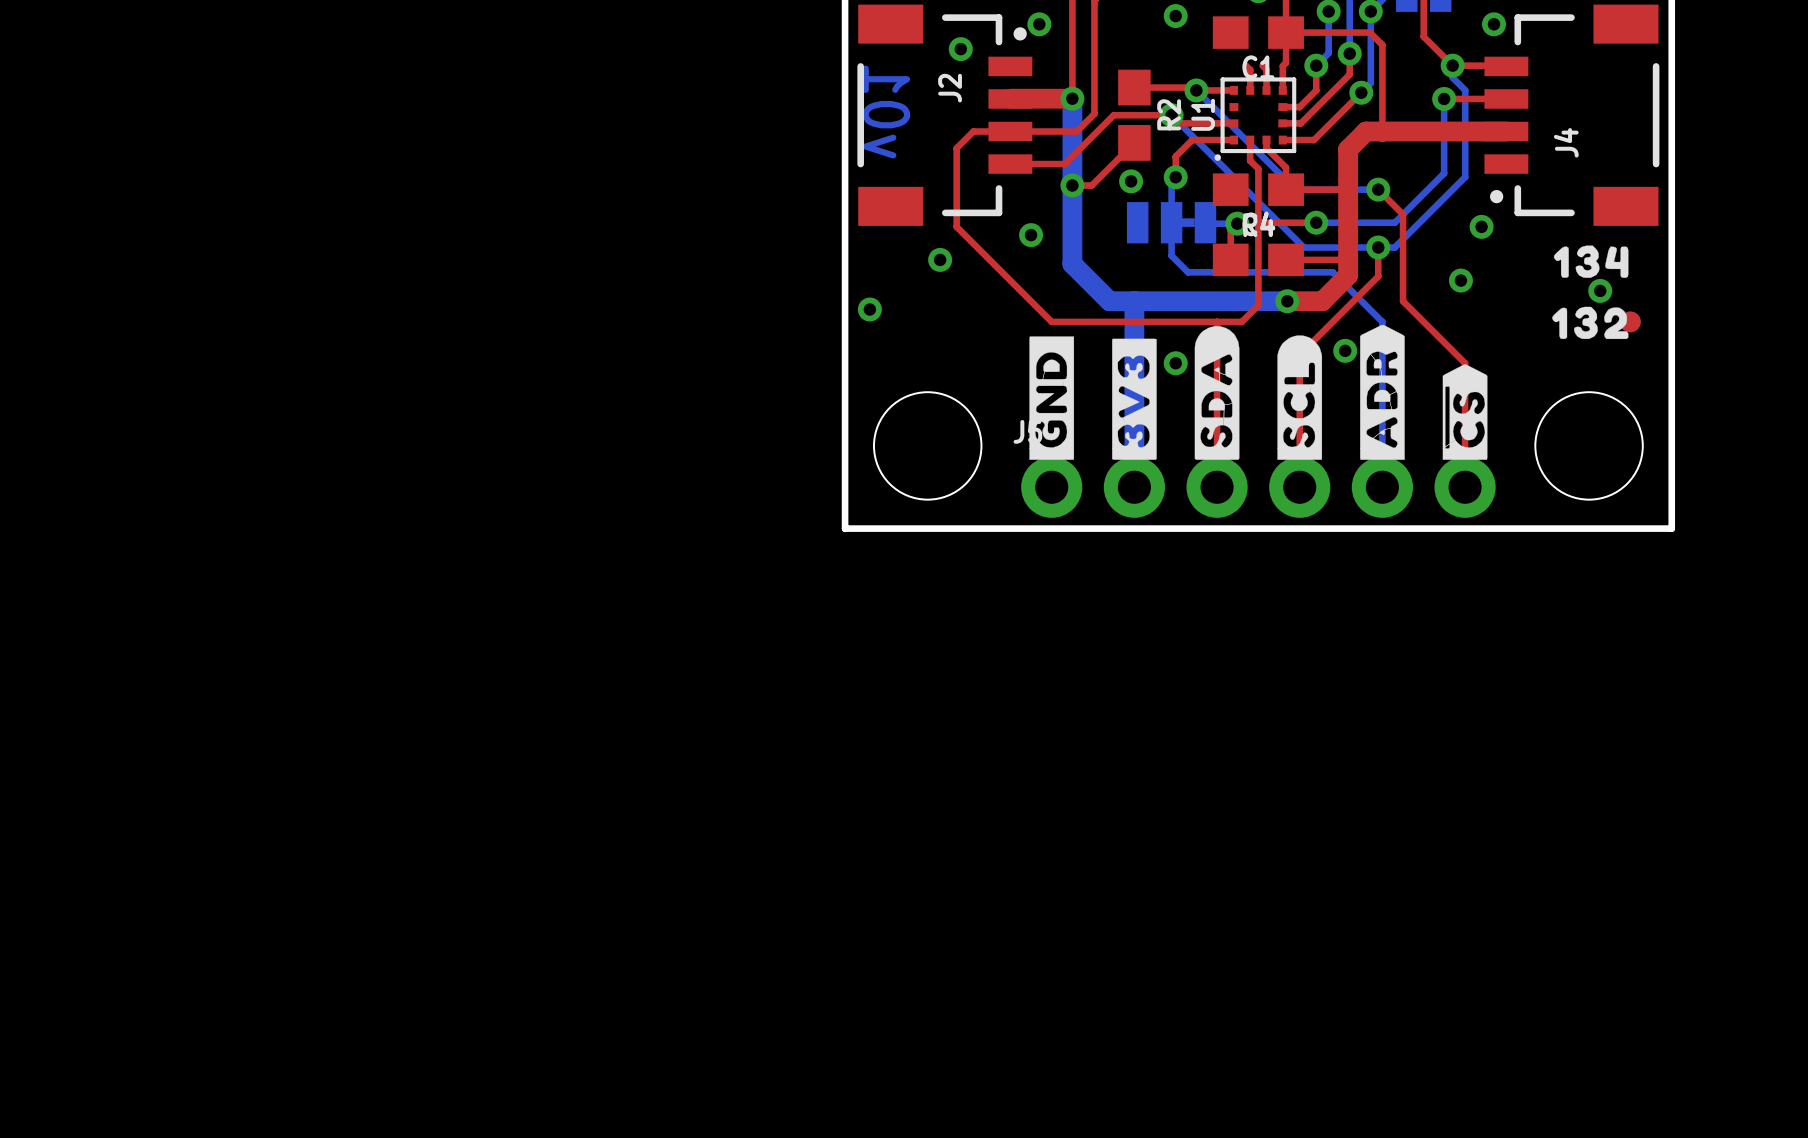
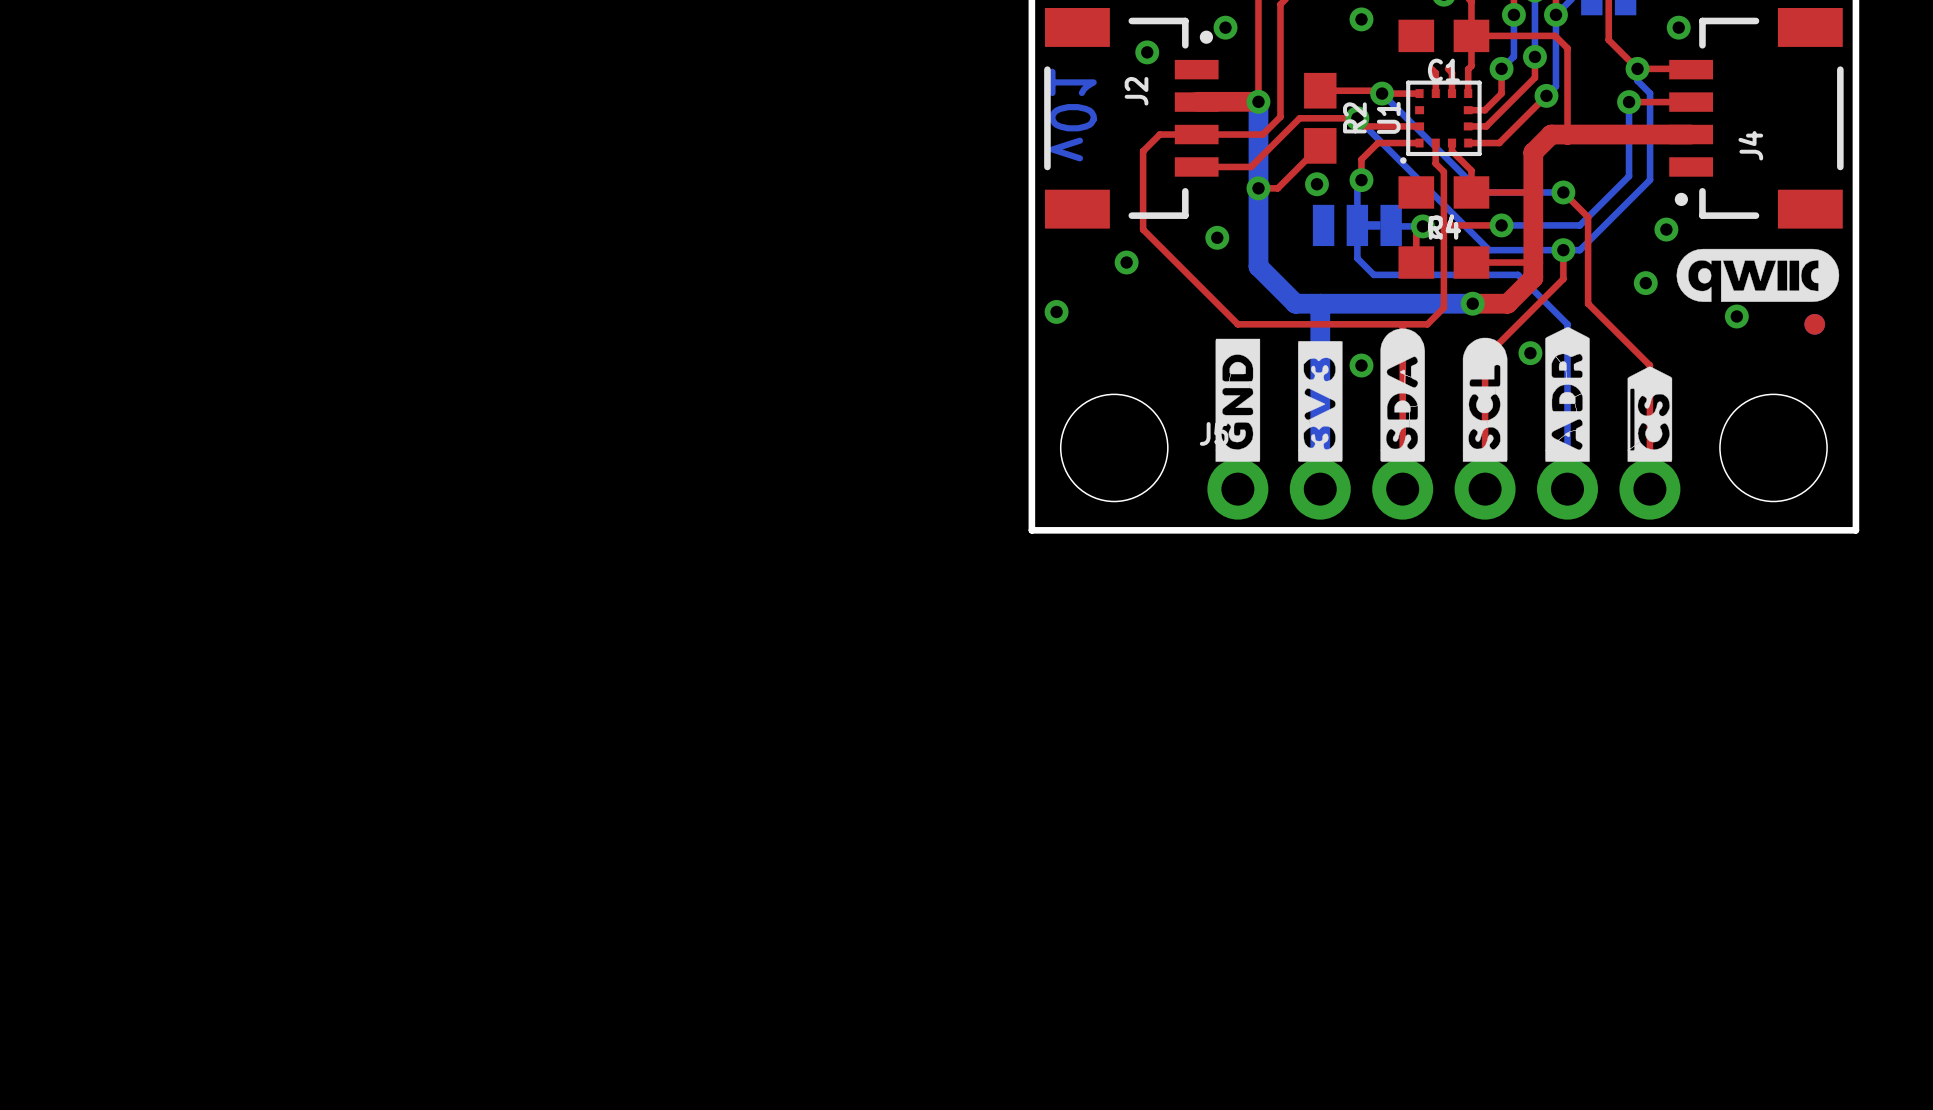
drawing shape: [1553, 245, 1629, 278] -> [1676, 248, 1840, 302]
via position: (1600, 290) -> (1736, 316)
drawing: [1552, 306, 1629, 340] -> none

